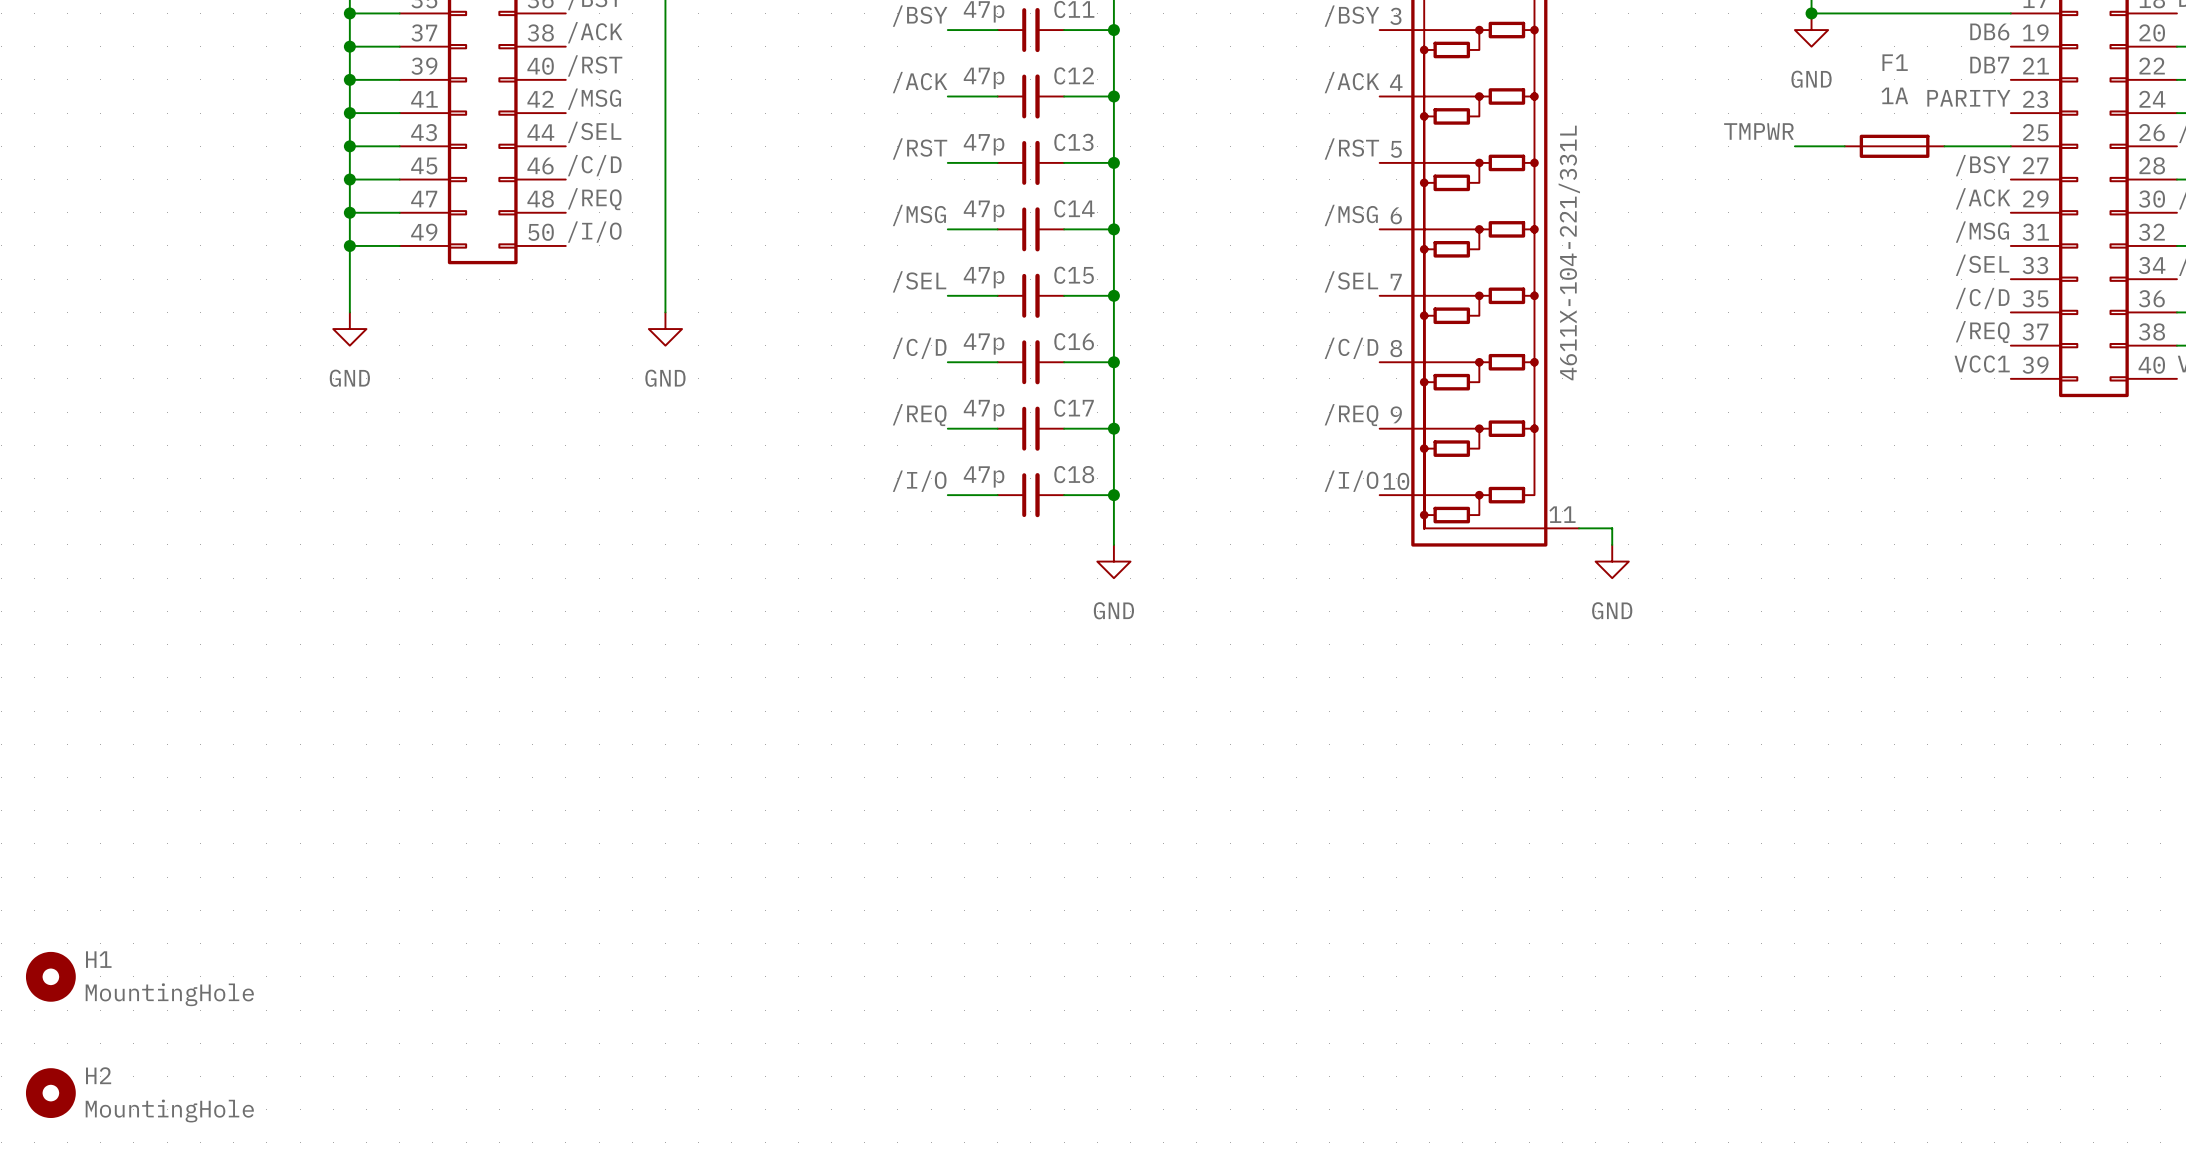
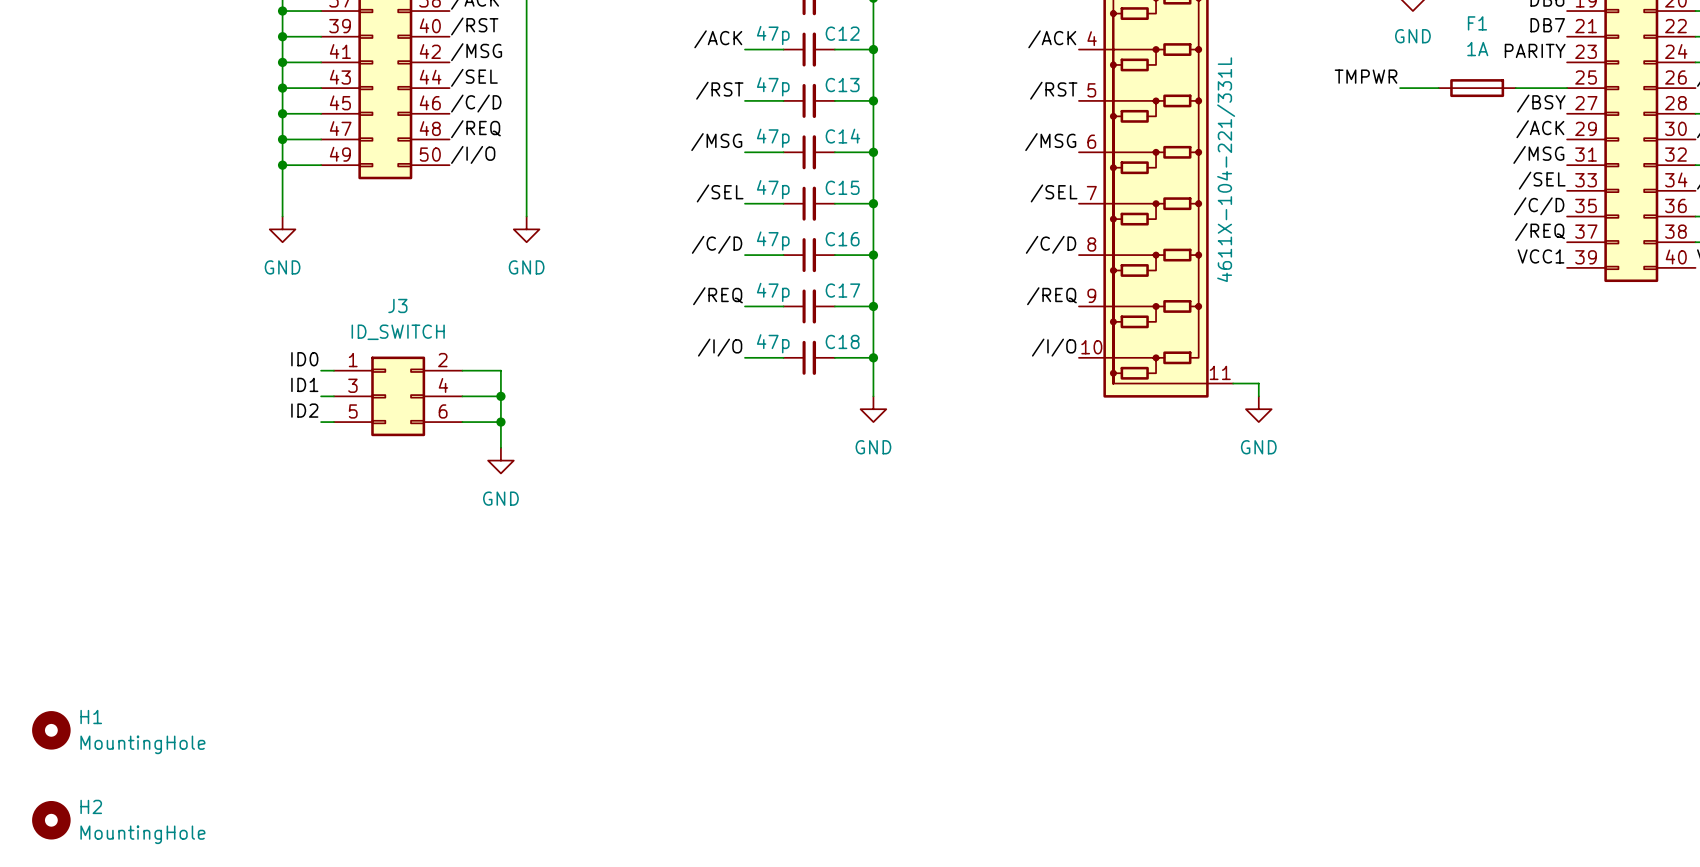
label: none -> ID0 (304, 359)
wire: none -> (321, 370) (333, 370)
wire: none -> (462, 370) (500, 370) (500, 447)
label: none -> ID1 (304, 384)
wire: none -> (321, 396) (333, 396)
J3: none -> ID_SWITCH (398, 396)
wire: none -> (462, 396) (500, 396)
junction: none -> (500, 396)
label: none -> ID2 (304, 410)
wire: none -> (321, 422) (333, 422)
wire: none -> (462, 422) (500, 422)
junction: none -> (500, 422)
power symbol: none -> GND (500, 460)

